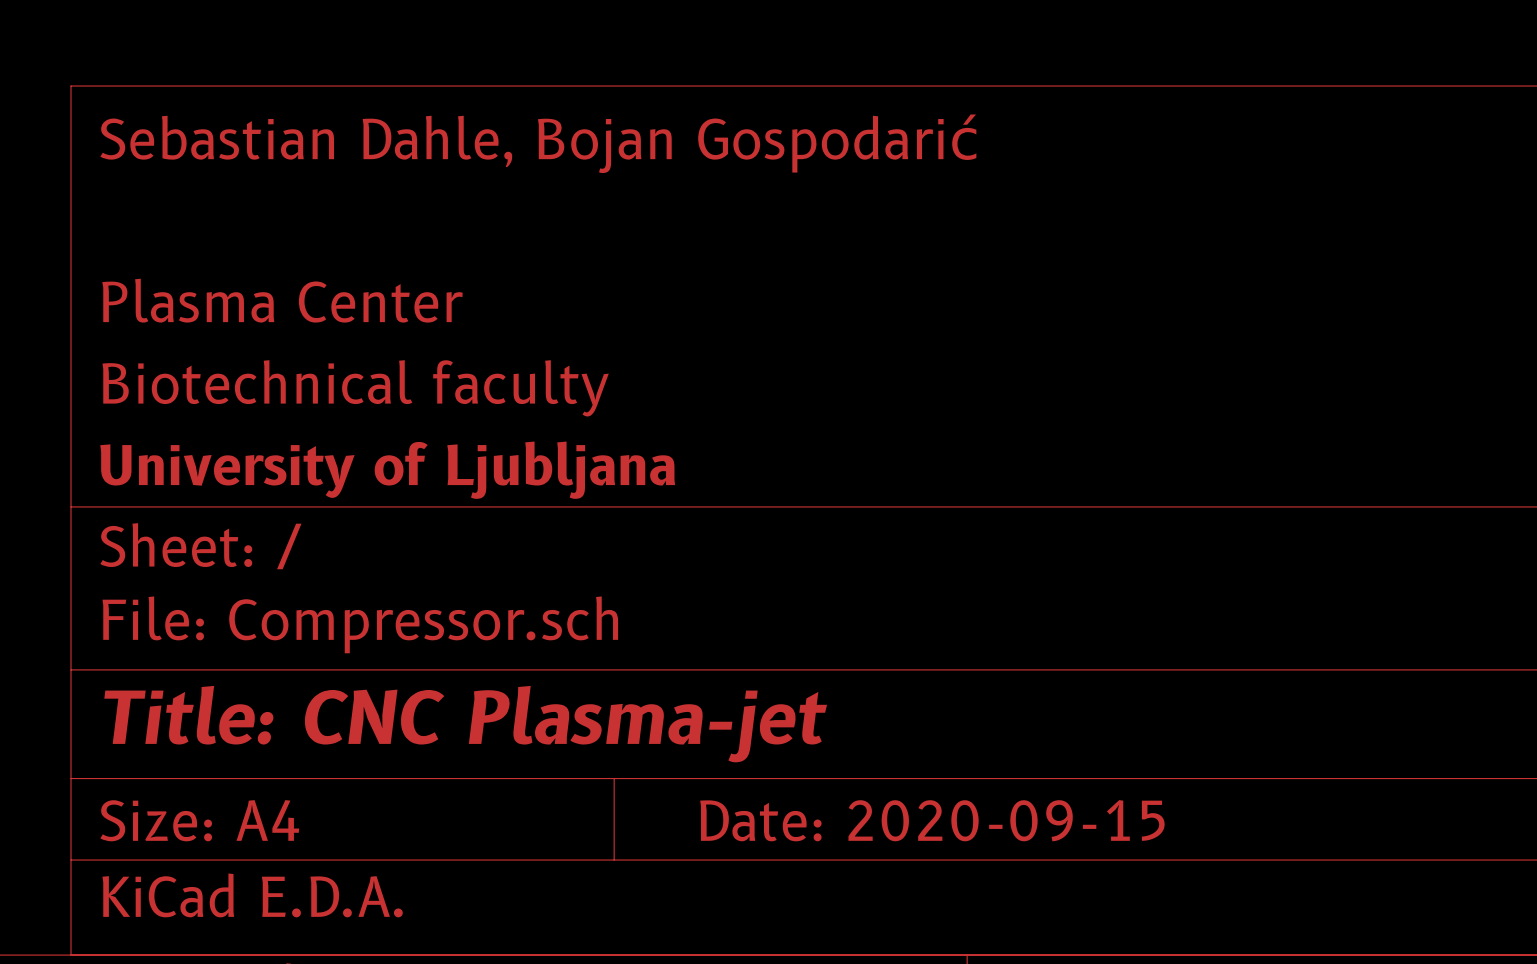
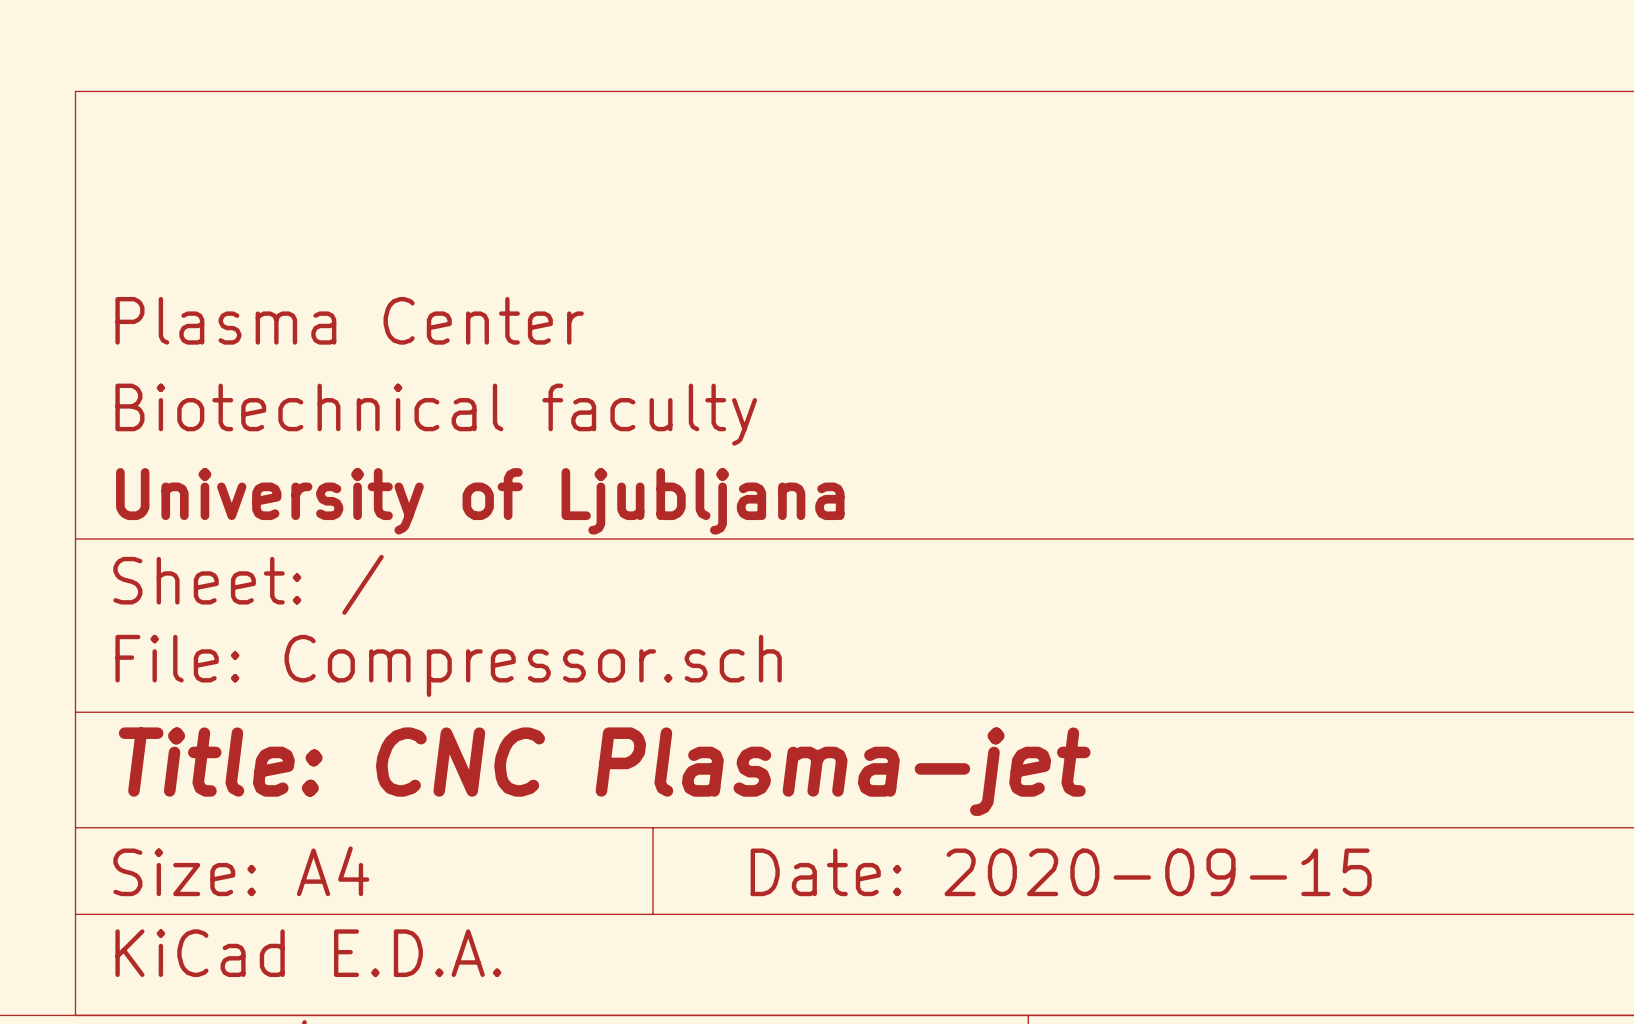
title block: Sebastian Dahle, Bojan Gospodarić (538, 143) -> none

